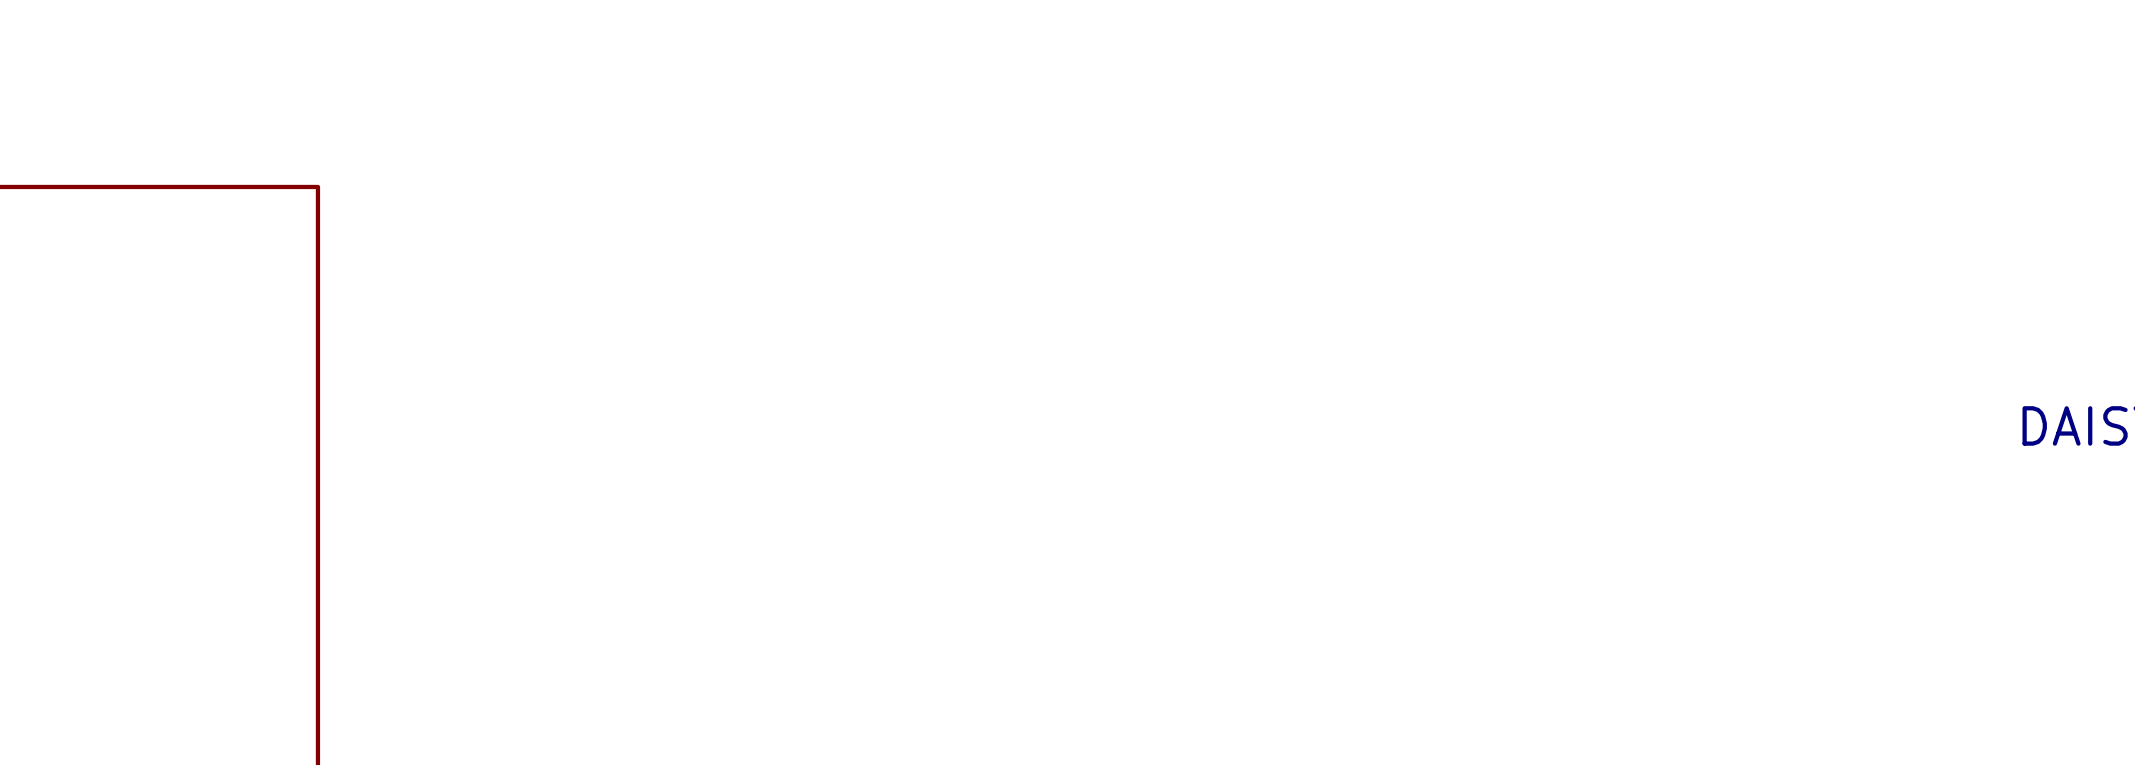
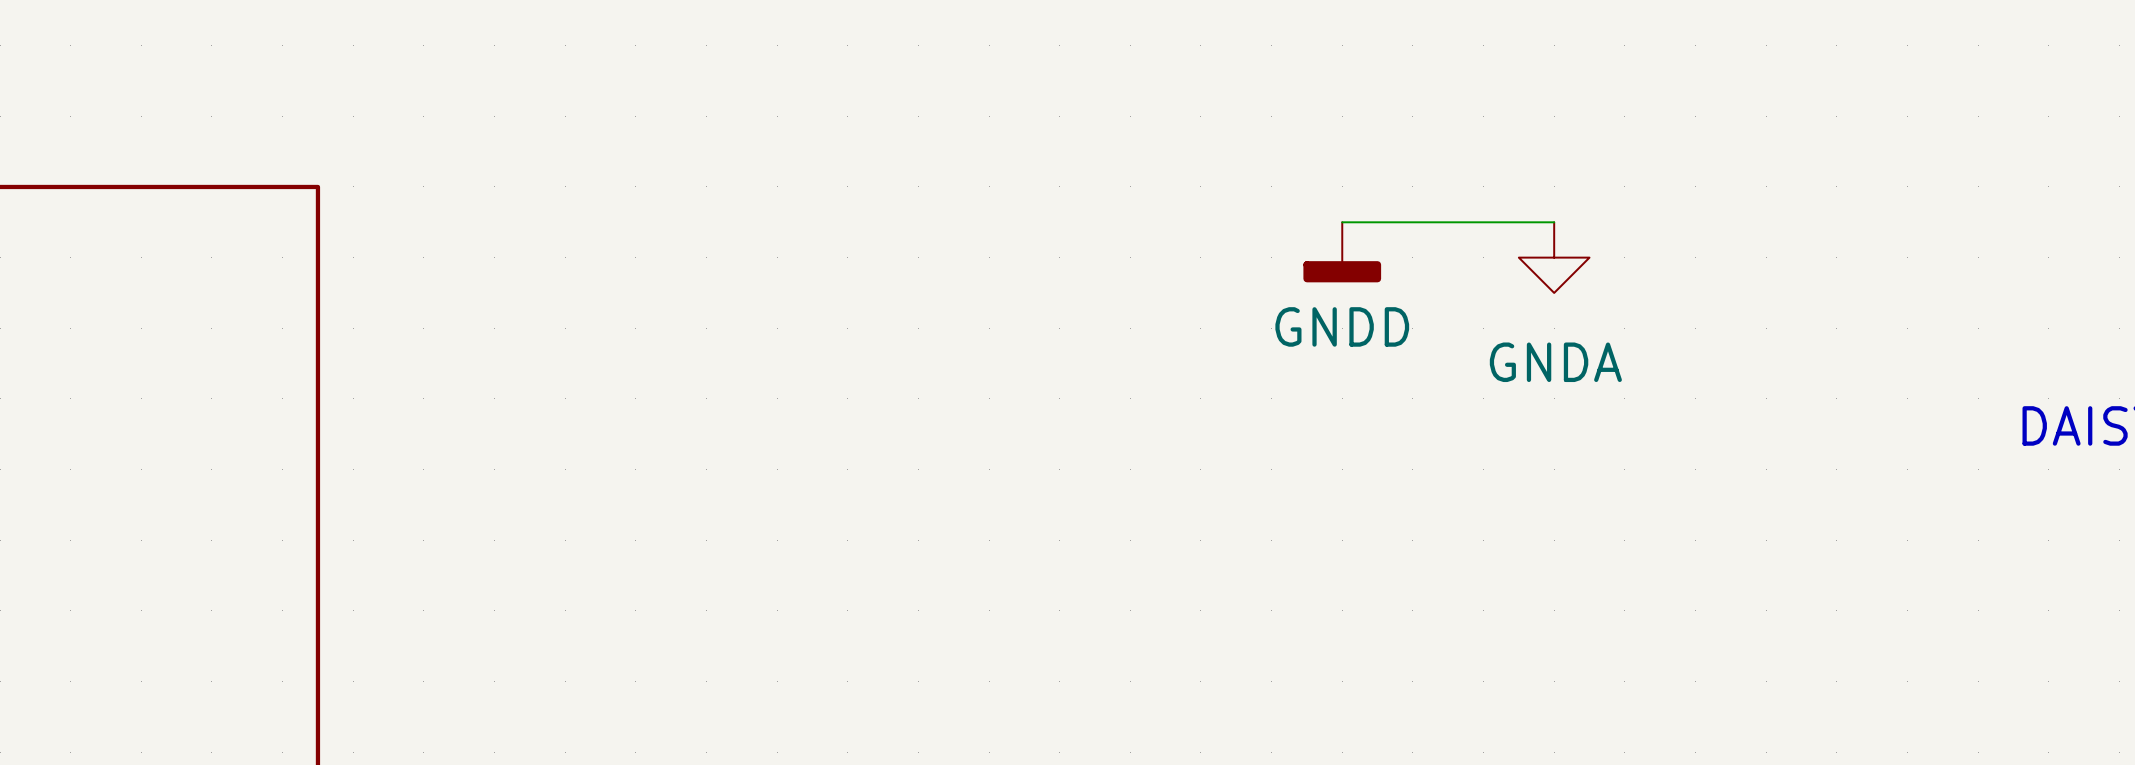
wire: none -> (1342, 222) (1554, 222)
power symbol: none -> GNDD (1342, 252)
power symbol: none -> GNDA (1554, 257)

